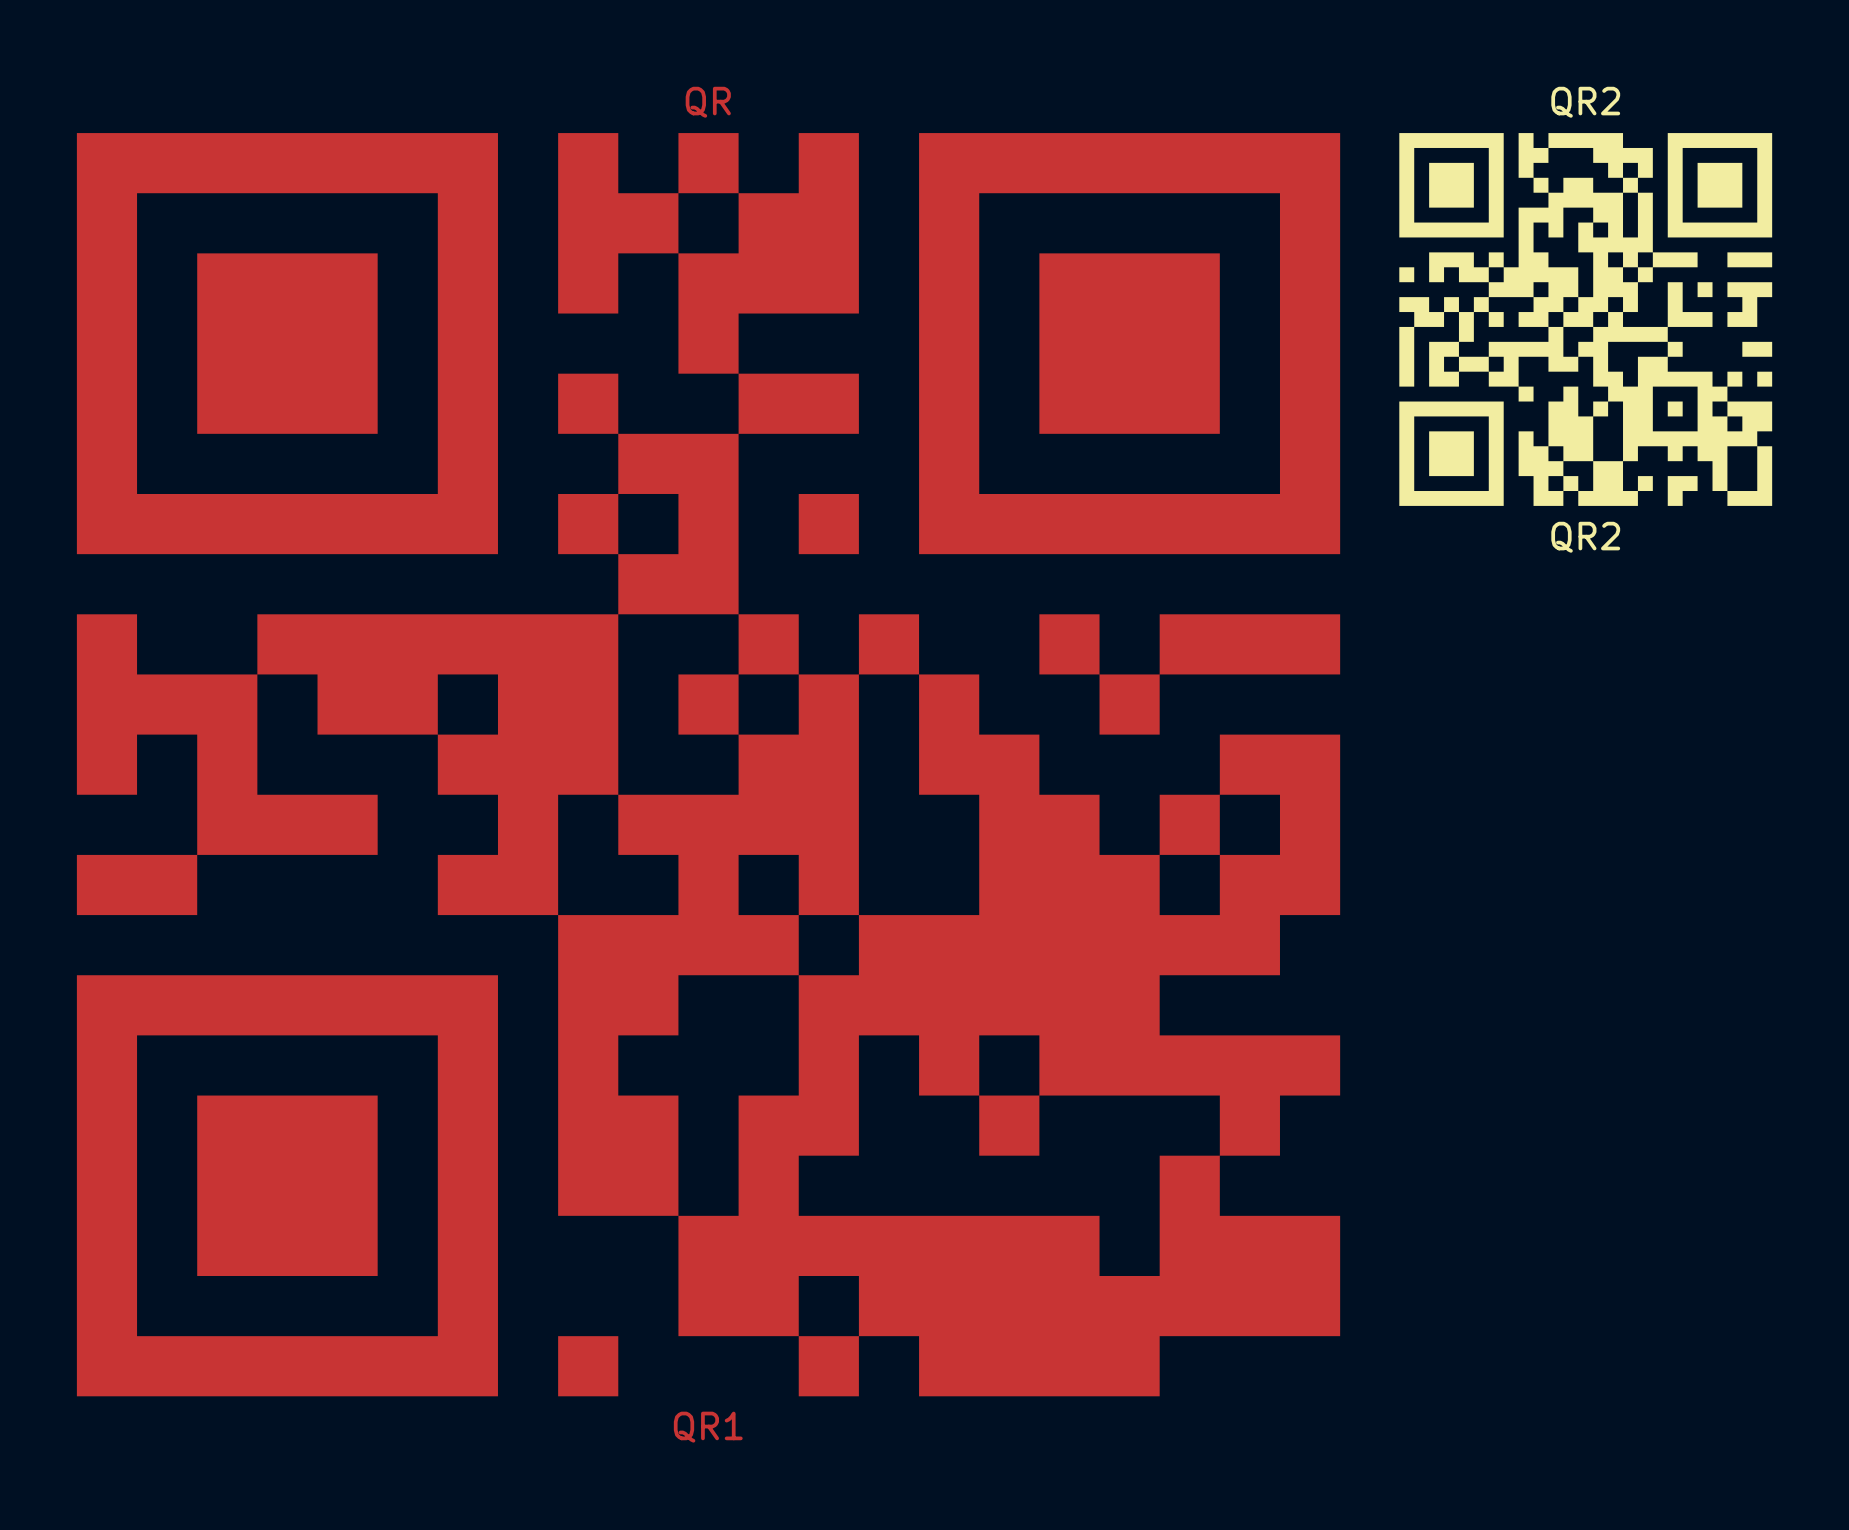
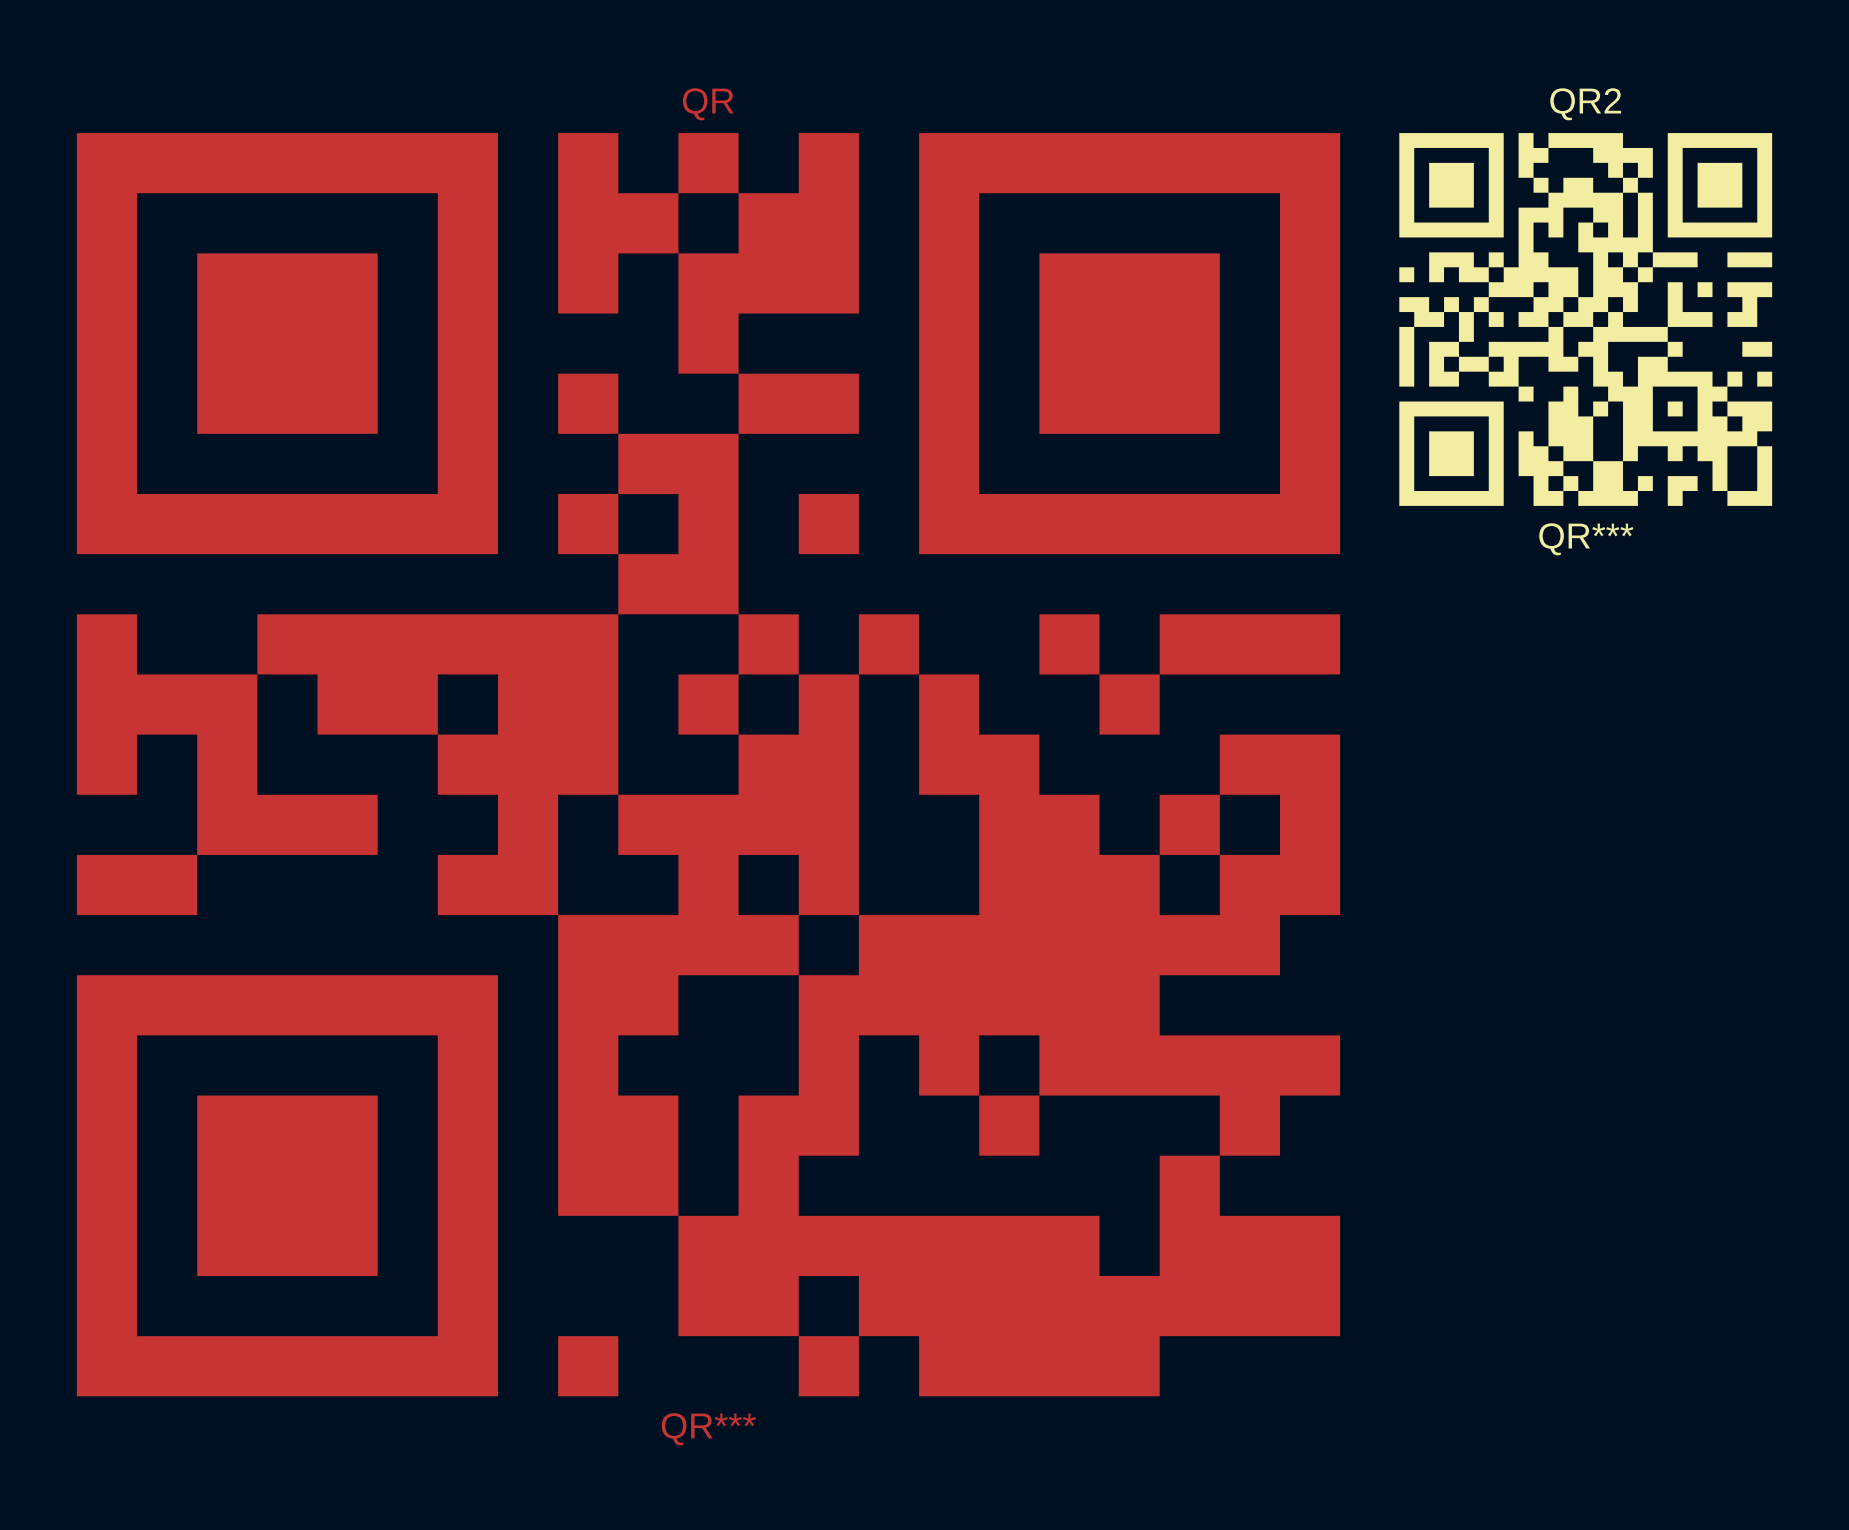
QR2 name: QR2 (1585, 537) -> QR*** (1586, 539)
QR1 name: QR1 (708, 1427) -> QR*** (708, 1429)

